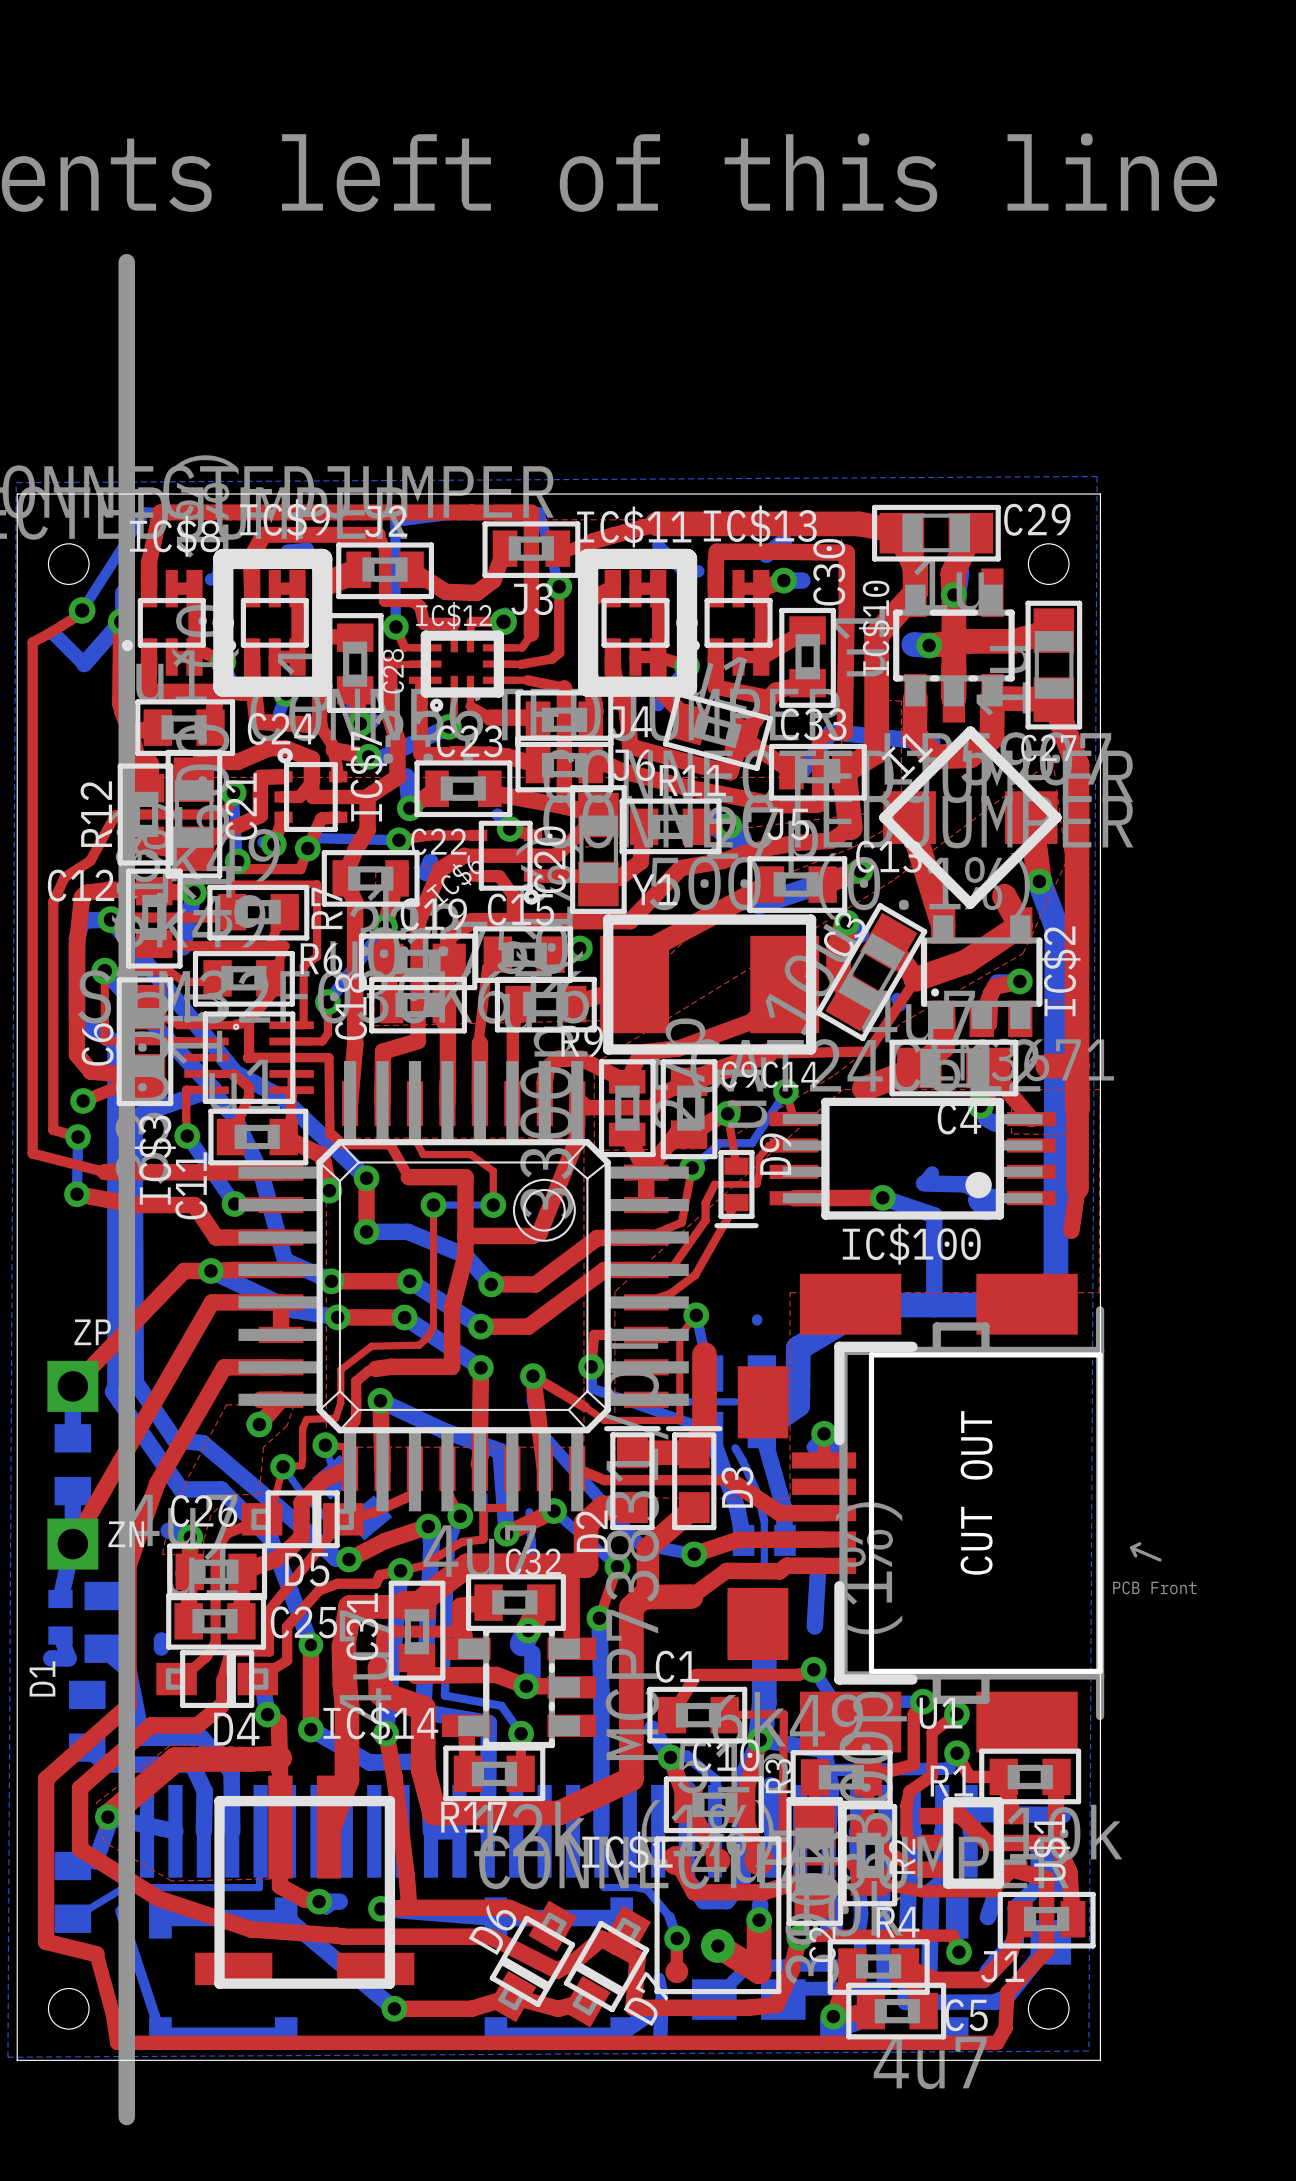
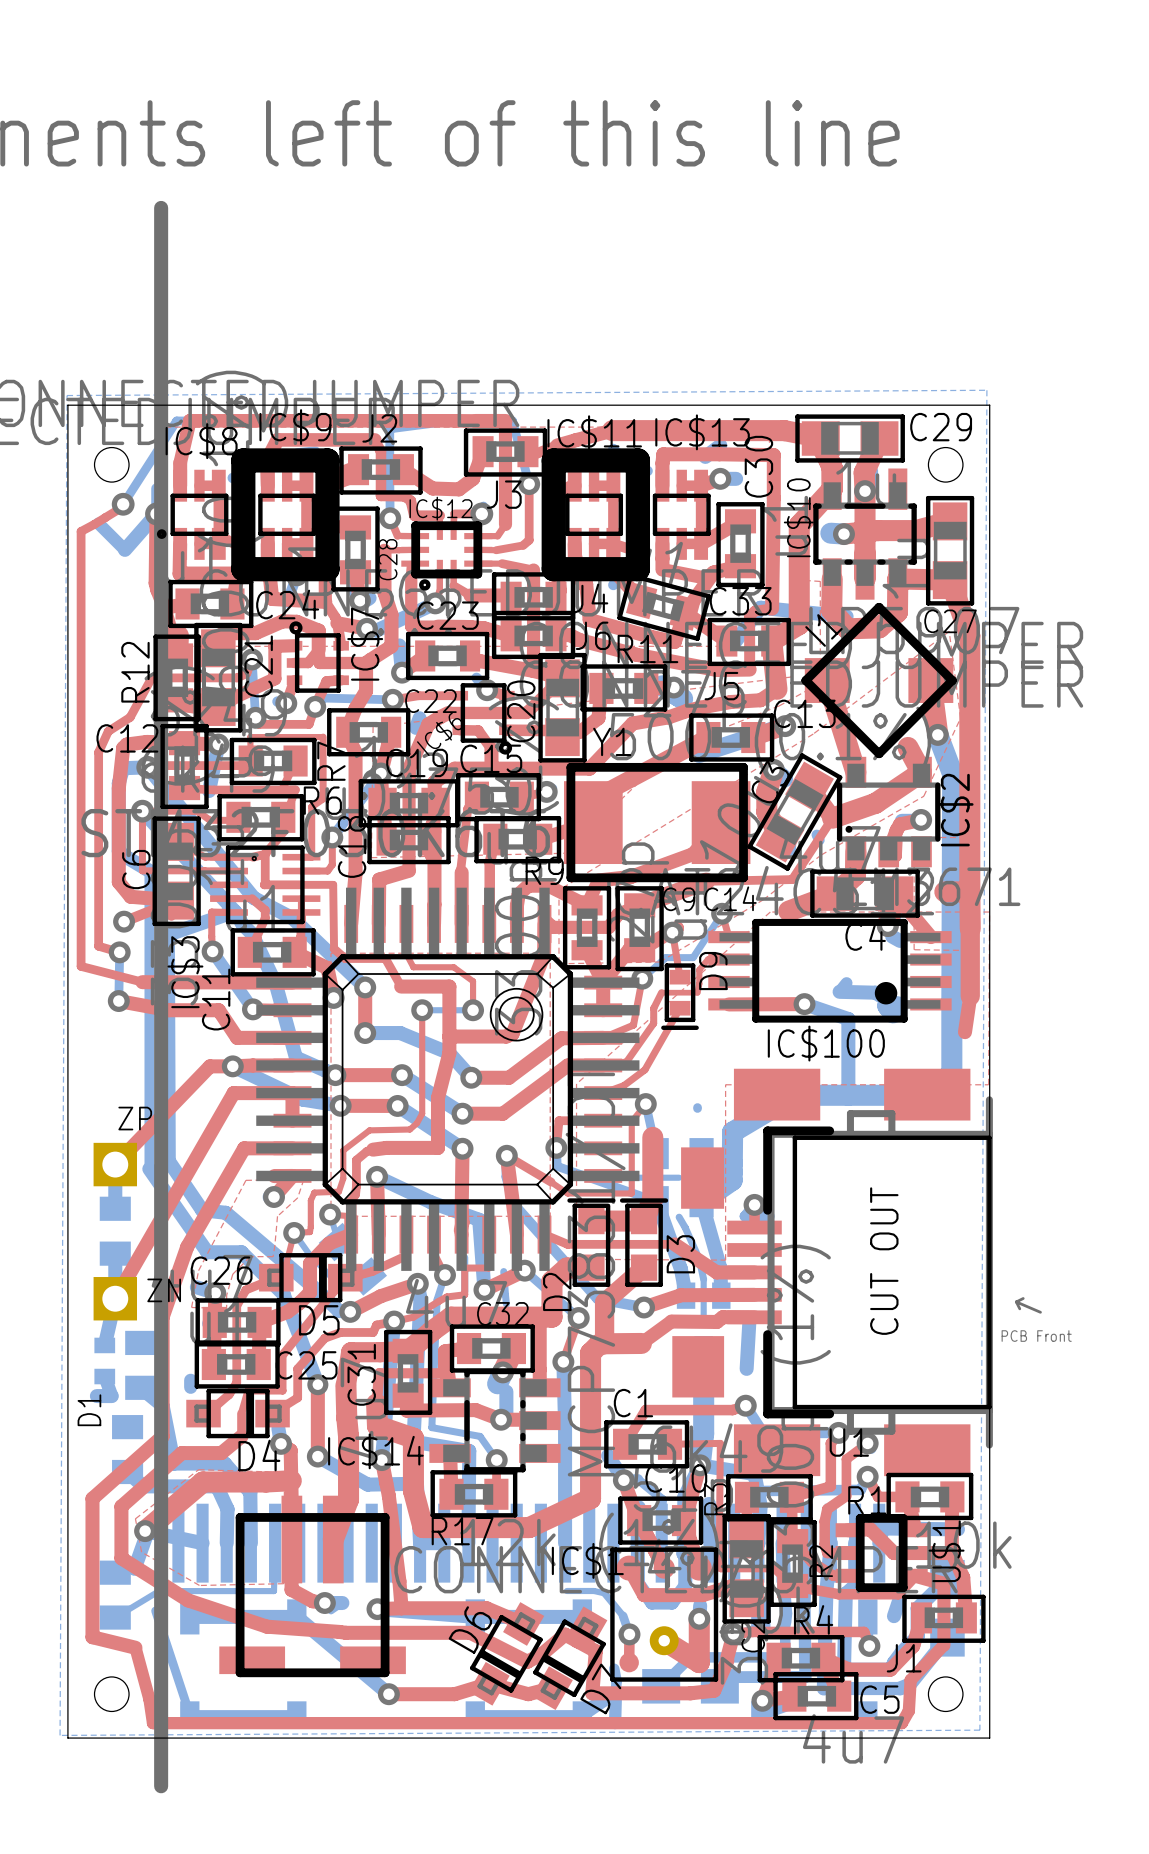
line width: thin (223, 558) (322, 558) (322, 686) (223, 686) (223, 558) -> thick (243, 460) (327, 460) (327, 569) (243, 569) (243, 460)
line width: thin (588, 558) (687, 558) (687, 686) (588, 686) (588, 558) -> thick (553, 460) (637, 460) (637, 569) (553, 569) (553, 460)

